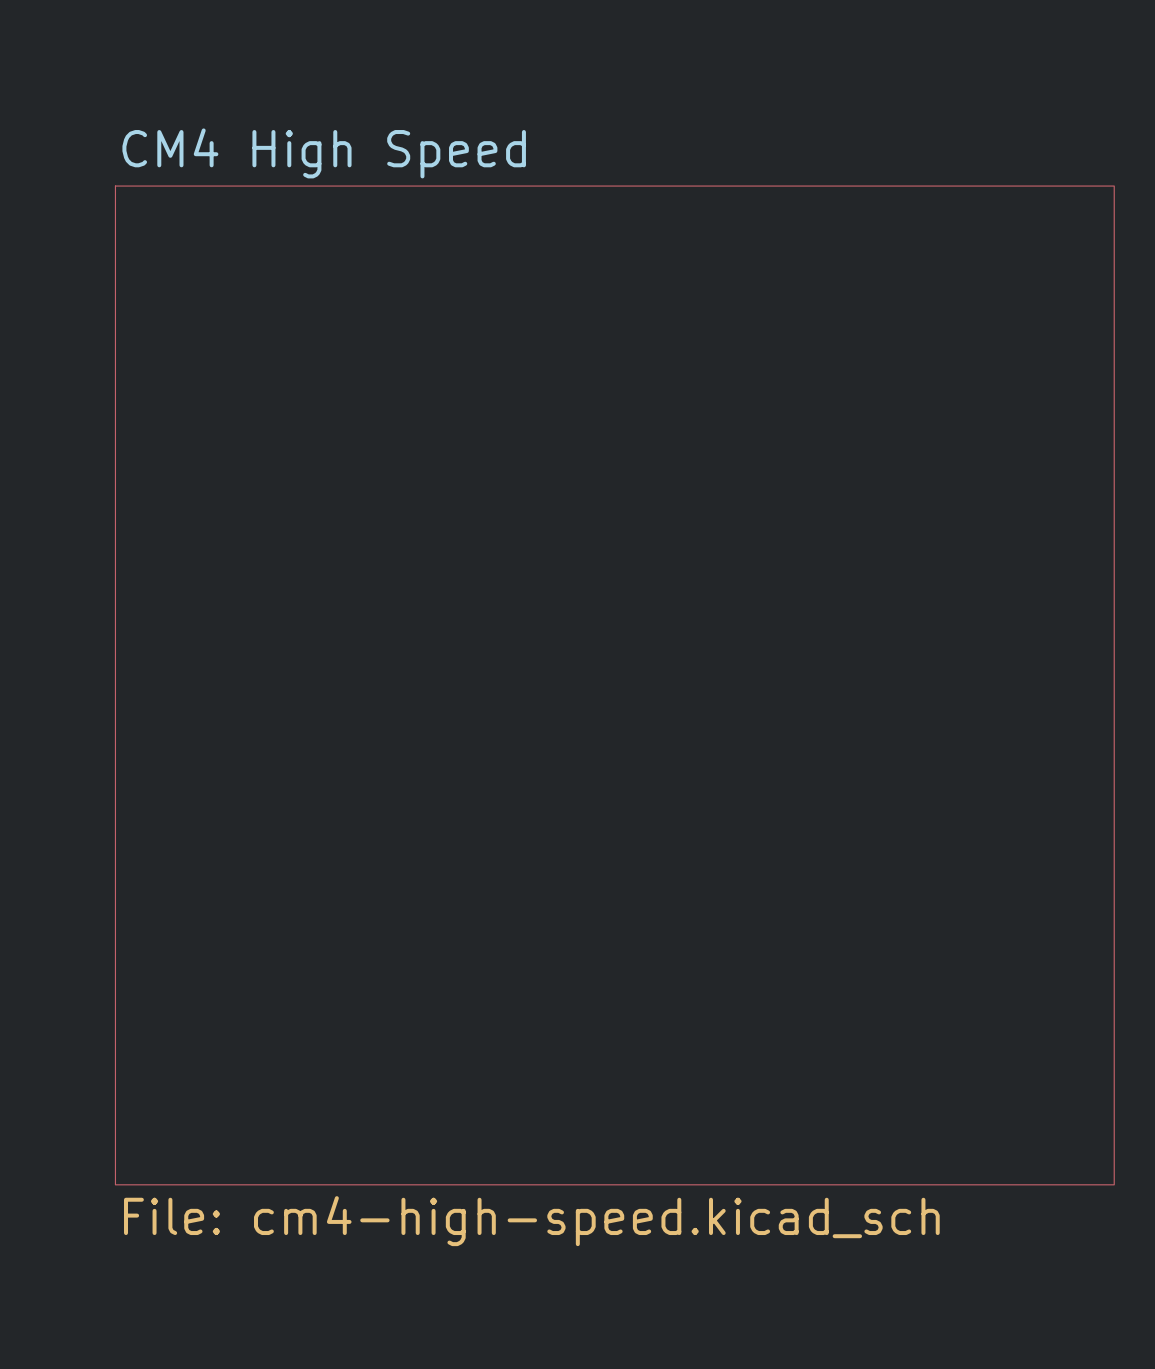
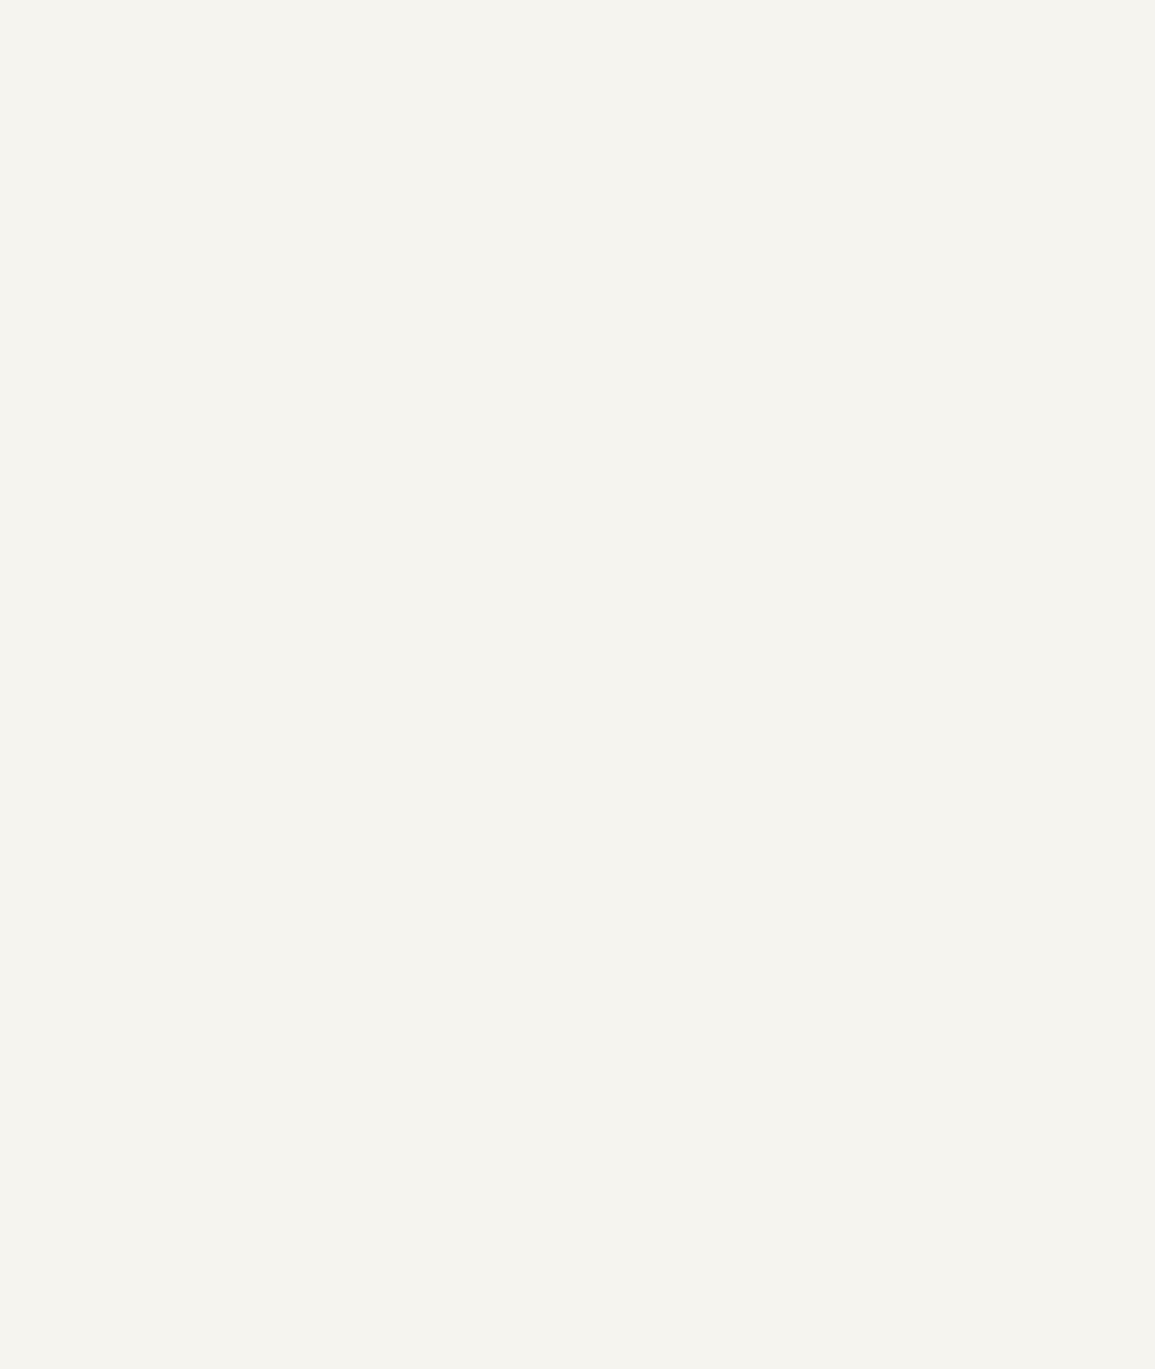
sheet CM4 High Speed: File: cm4-high-speed.kicad_sch (614, 685) -> none

